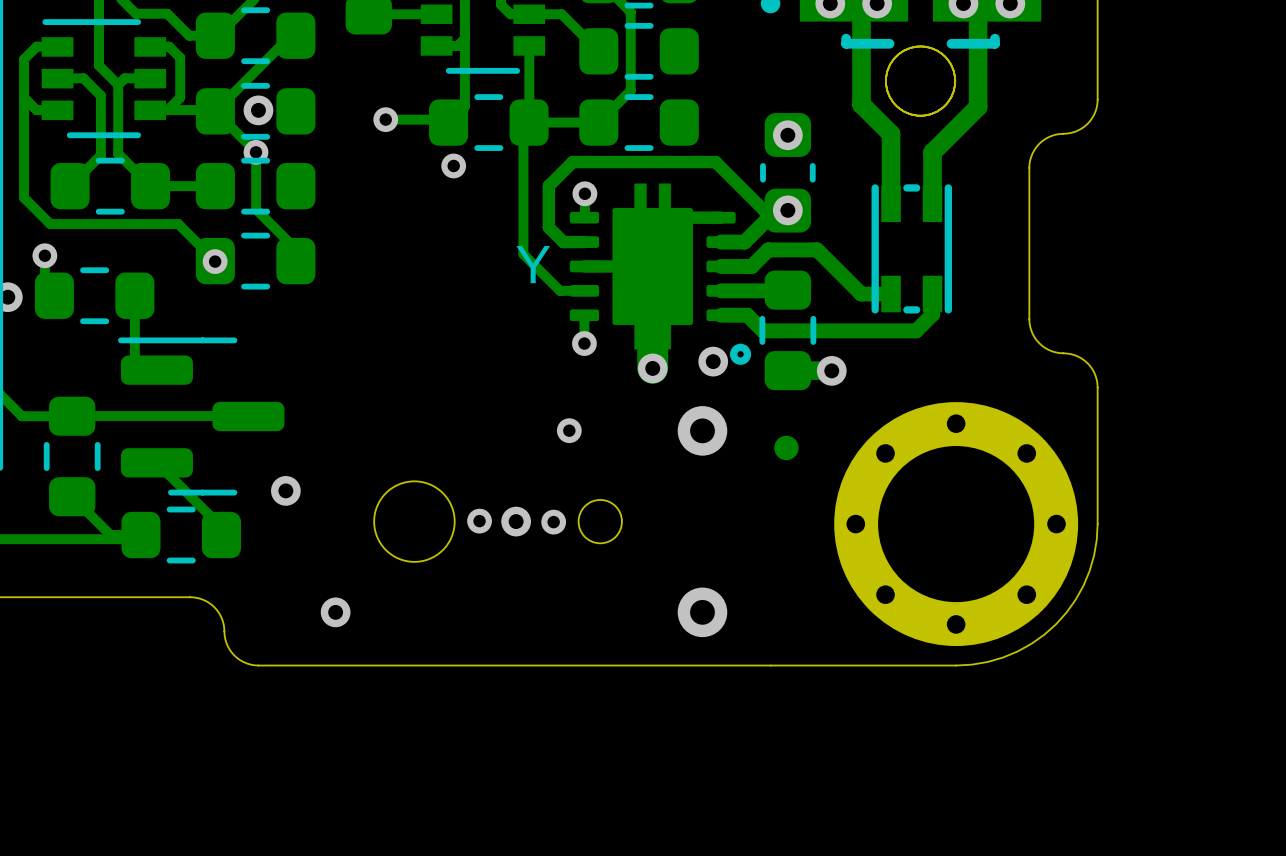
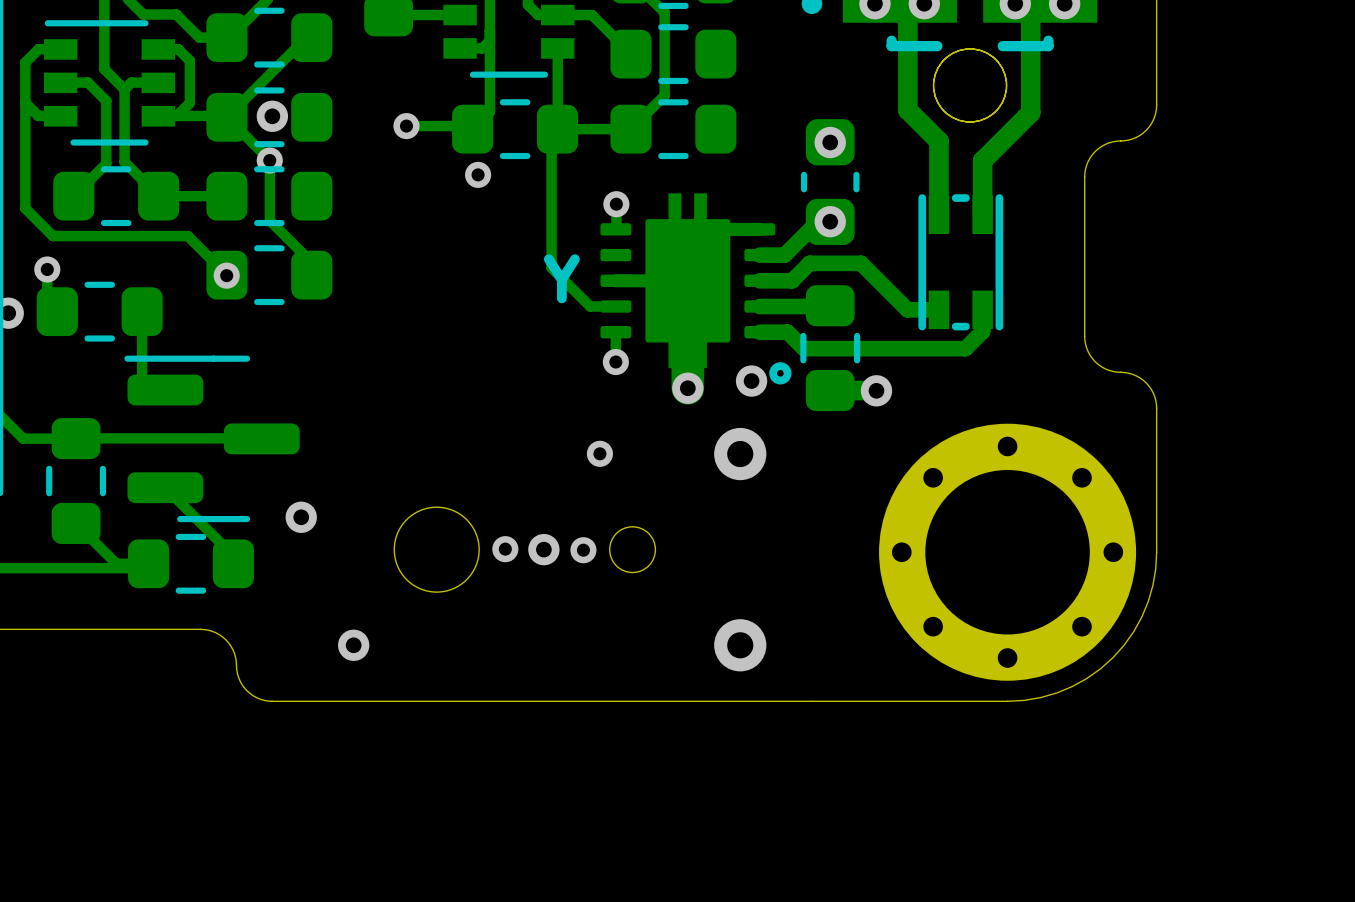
track: (787, 210) (764, 210) (715, 162) (572, 162) (548, 185) (548, 227) (563, 242) (584, 242) -> none
part: (786, 447) -> none

